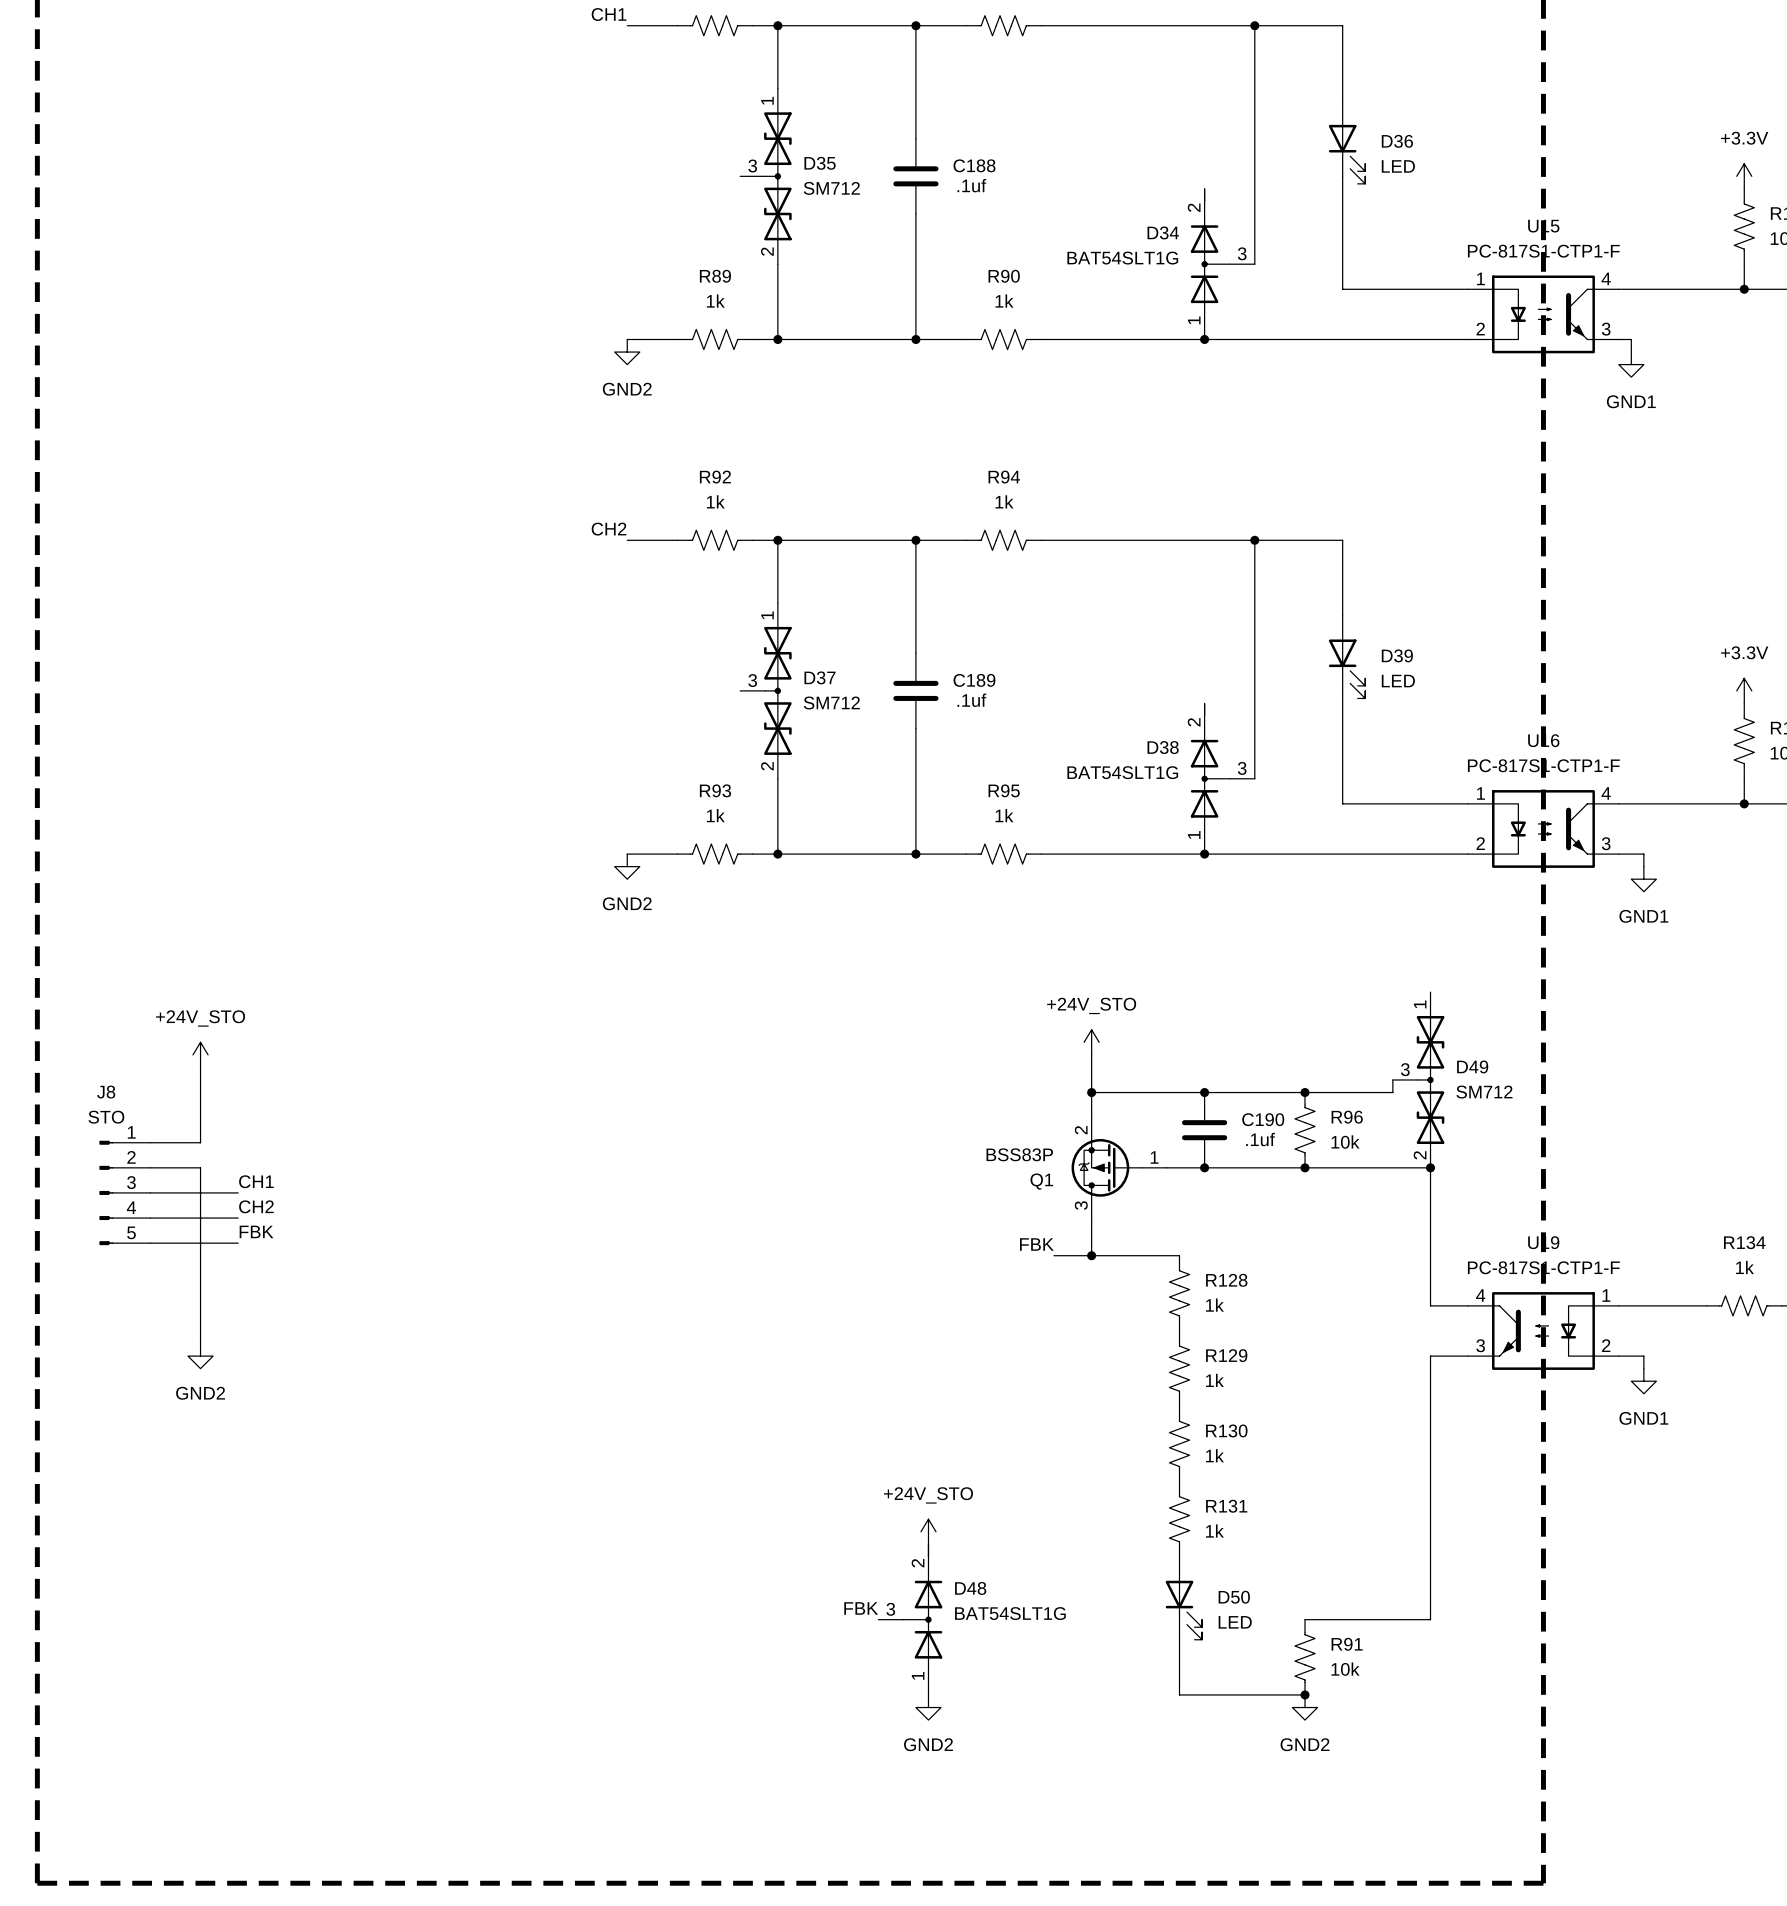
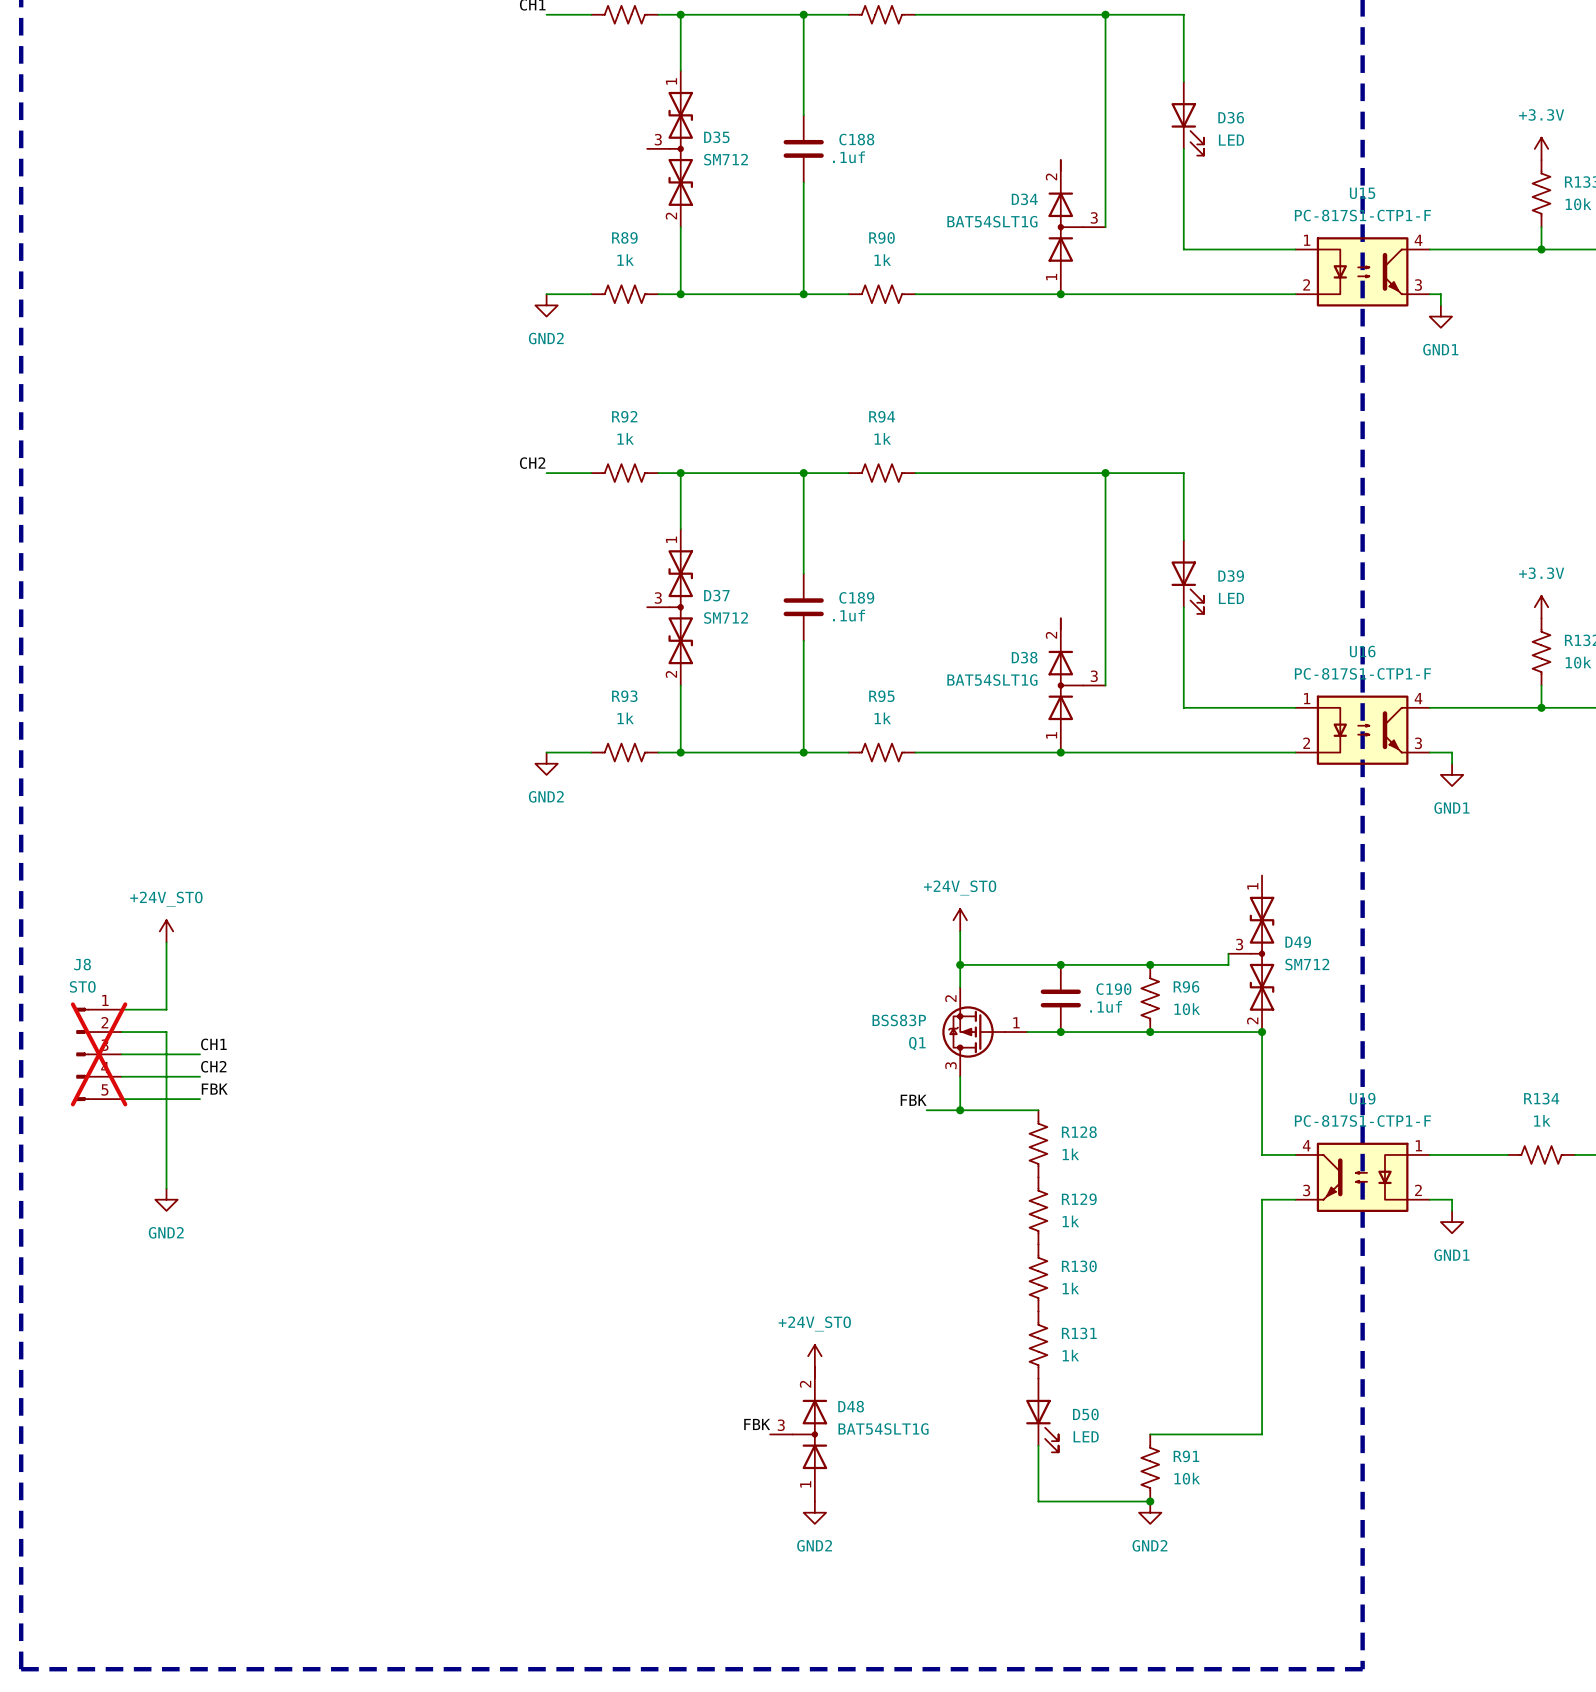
J8 do-not-place cross: none -> (99, 1054)

